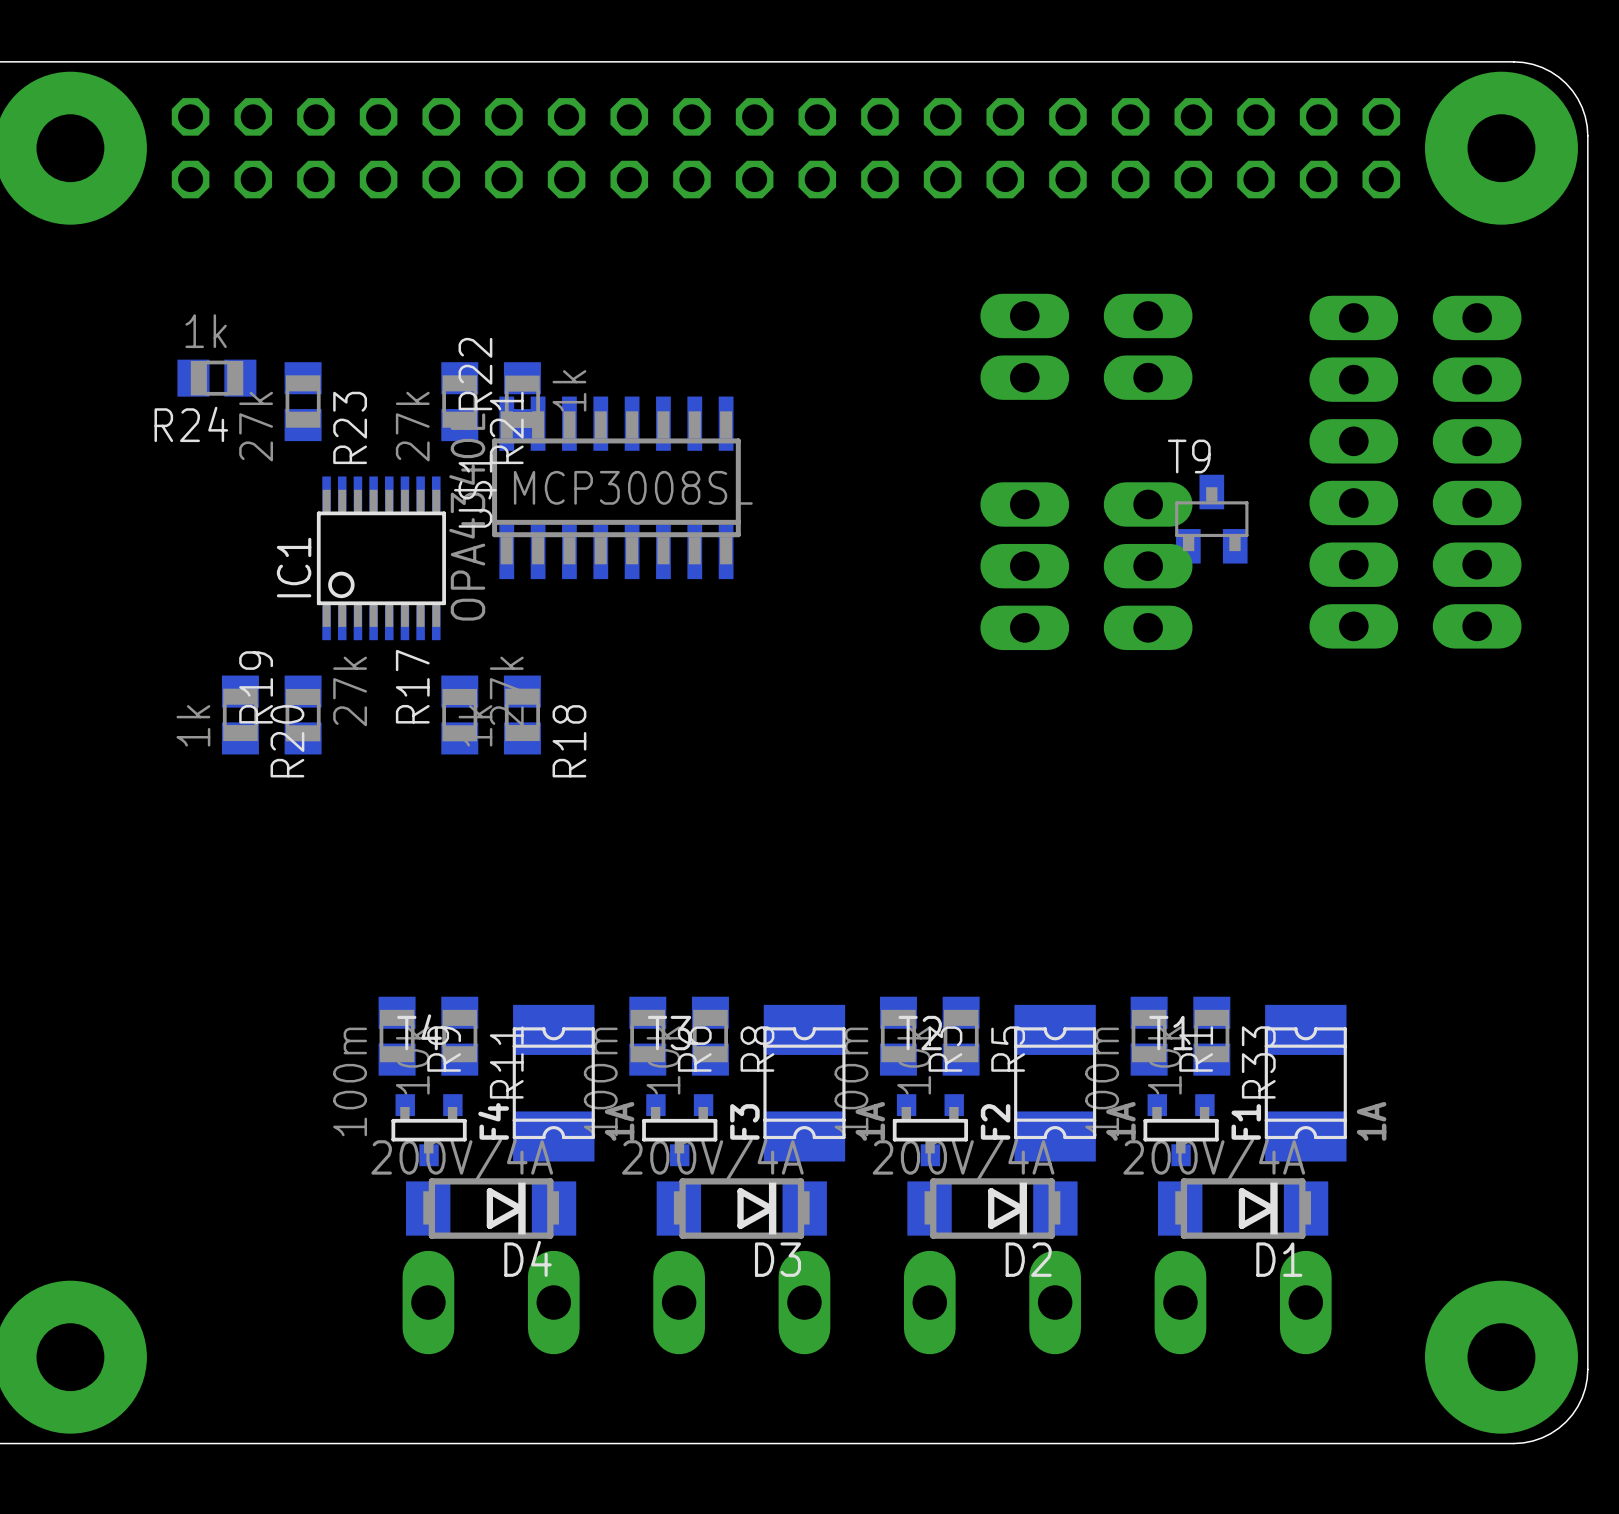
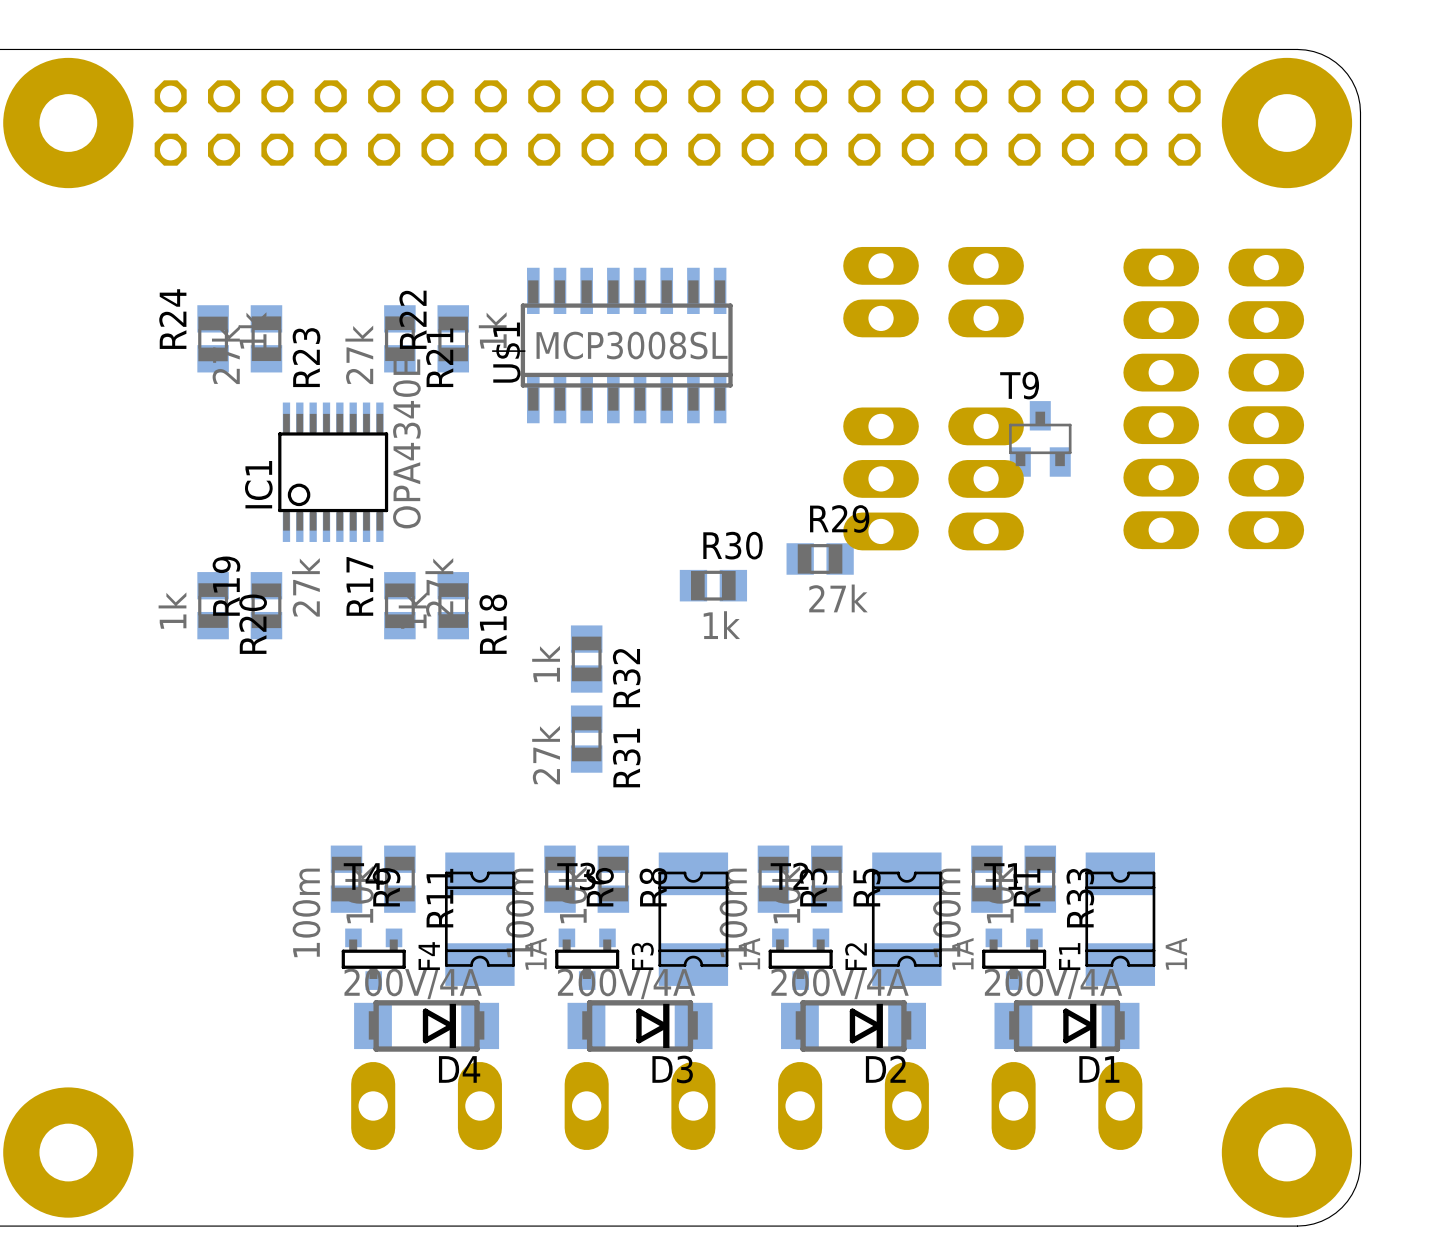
R24 rotation: 0° (216, 378) -> 90° clockwise (213, 338)
U$1 position: (616, 487) -> (626, 345)
R29: none -> 27k (820, 558)
R30: none -> 1k (713, 585)
R32: none -> 1k (586, 659)
R31: none -> 27k (586, 739)

